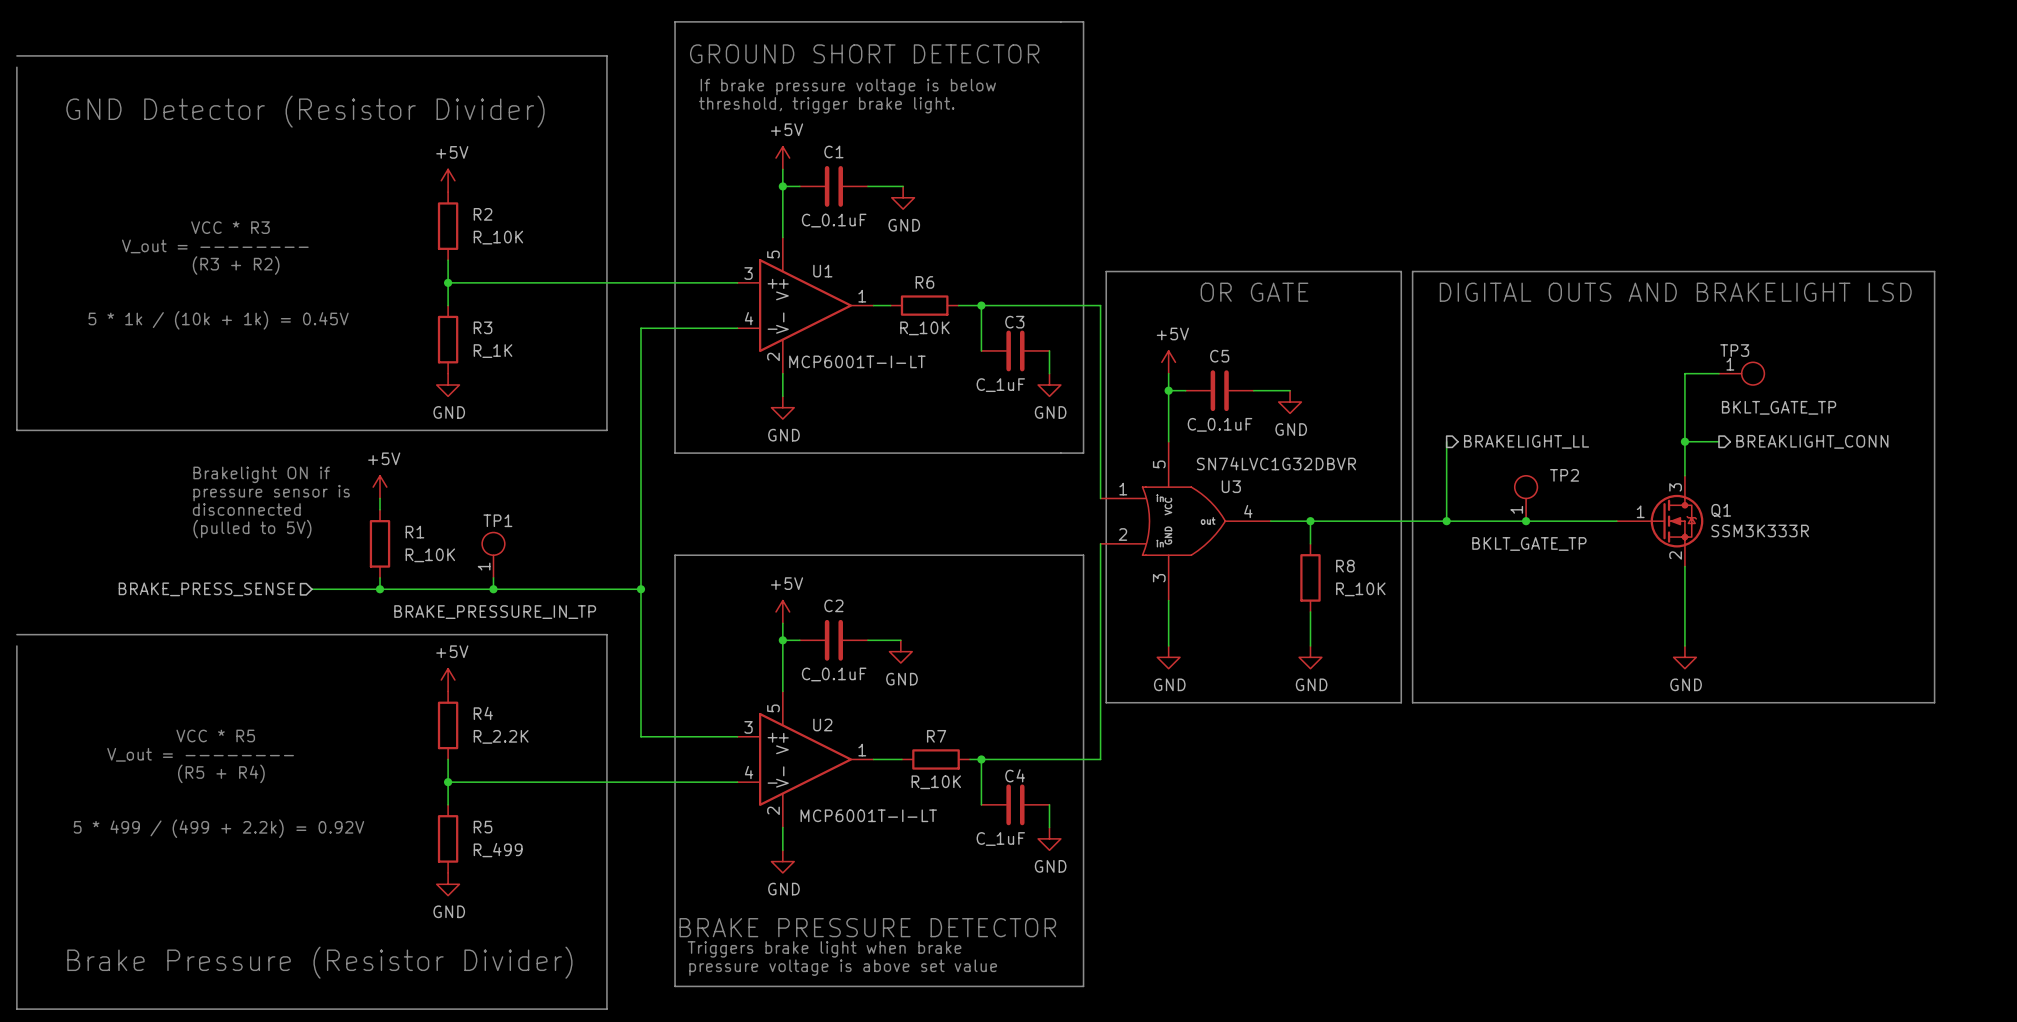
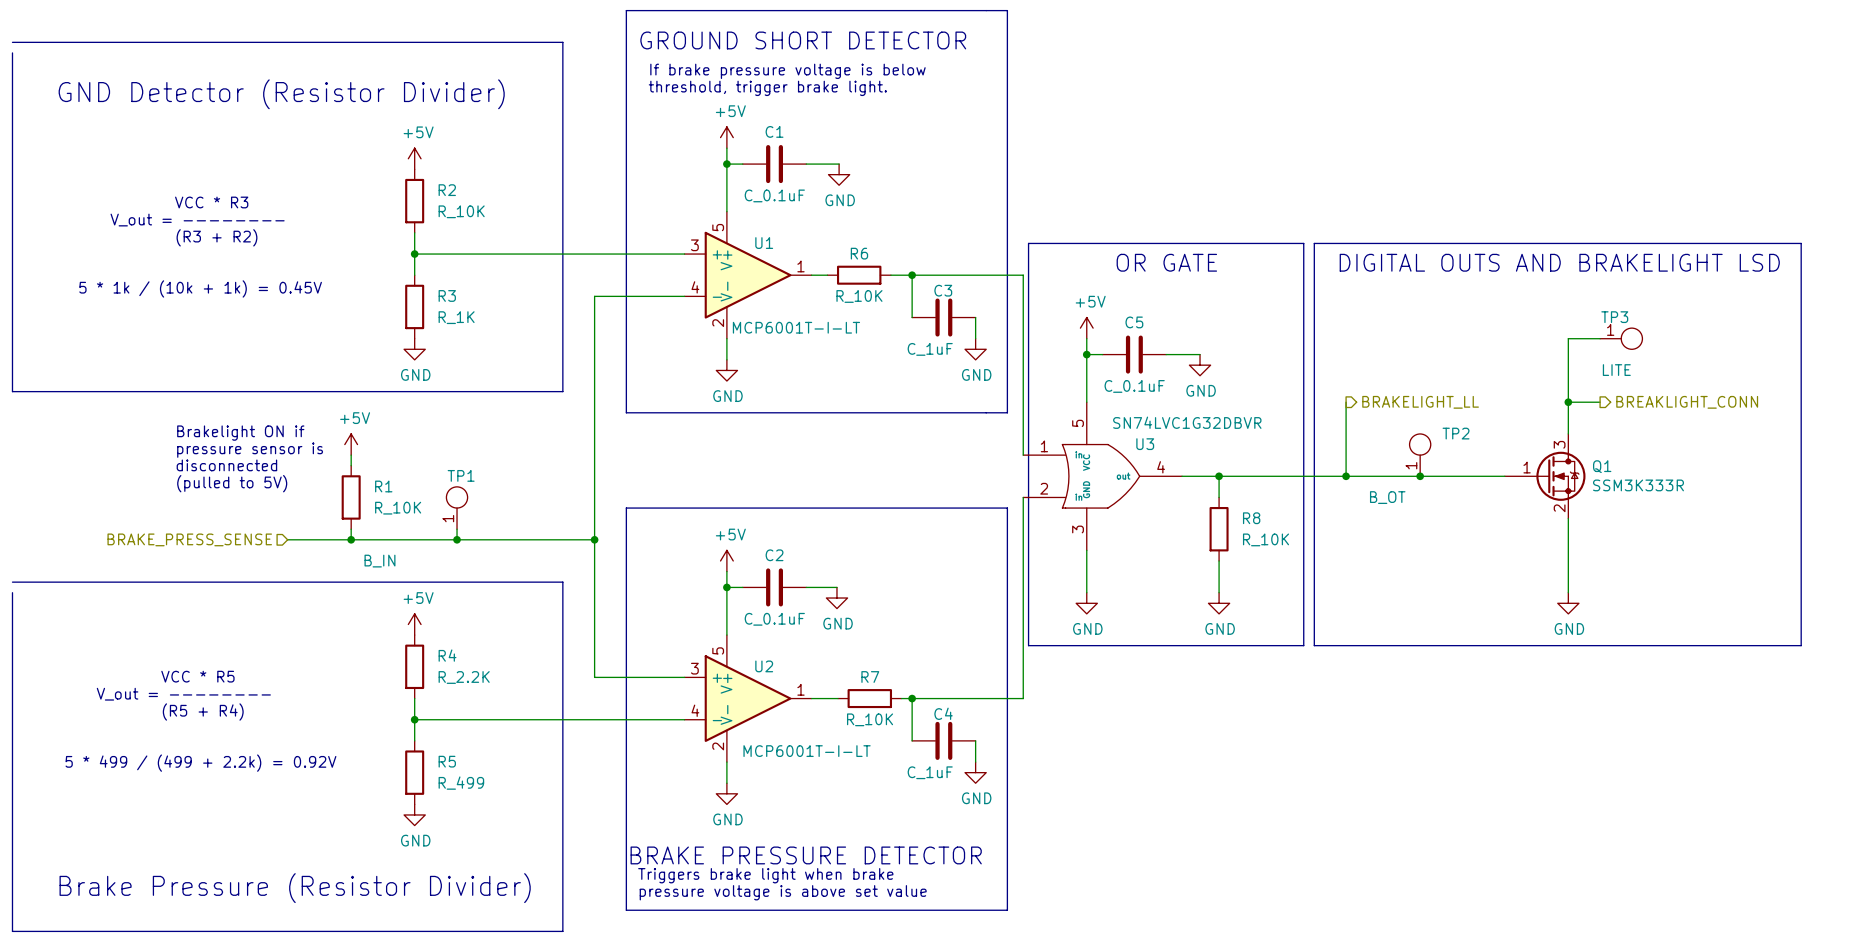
TP3 value: BKLT_GATE_TP (1779, 407) -> LITE (1616, 370)
TP2 value: BKLT_GATE_TP (1529, 543) -> B_OT (1387, 497)
TP1 value: BRAKE_PRESSURE_IN_TP (495, 612) -> B_IN (379, 561)

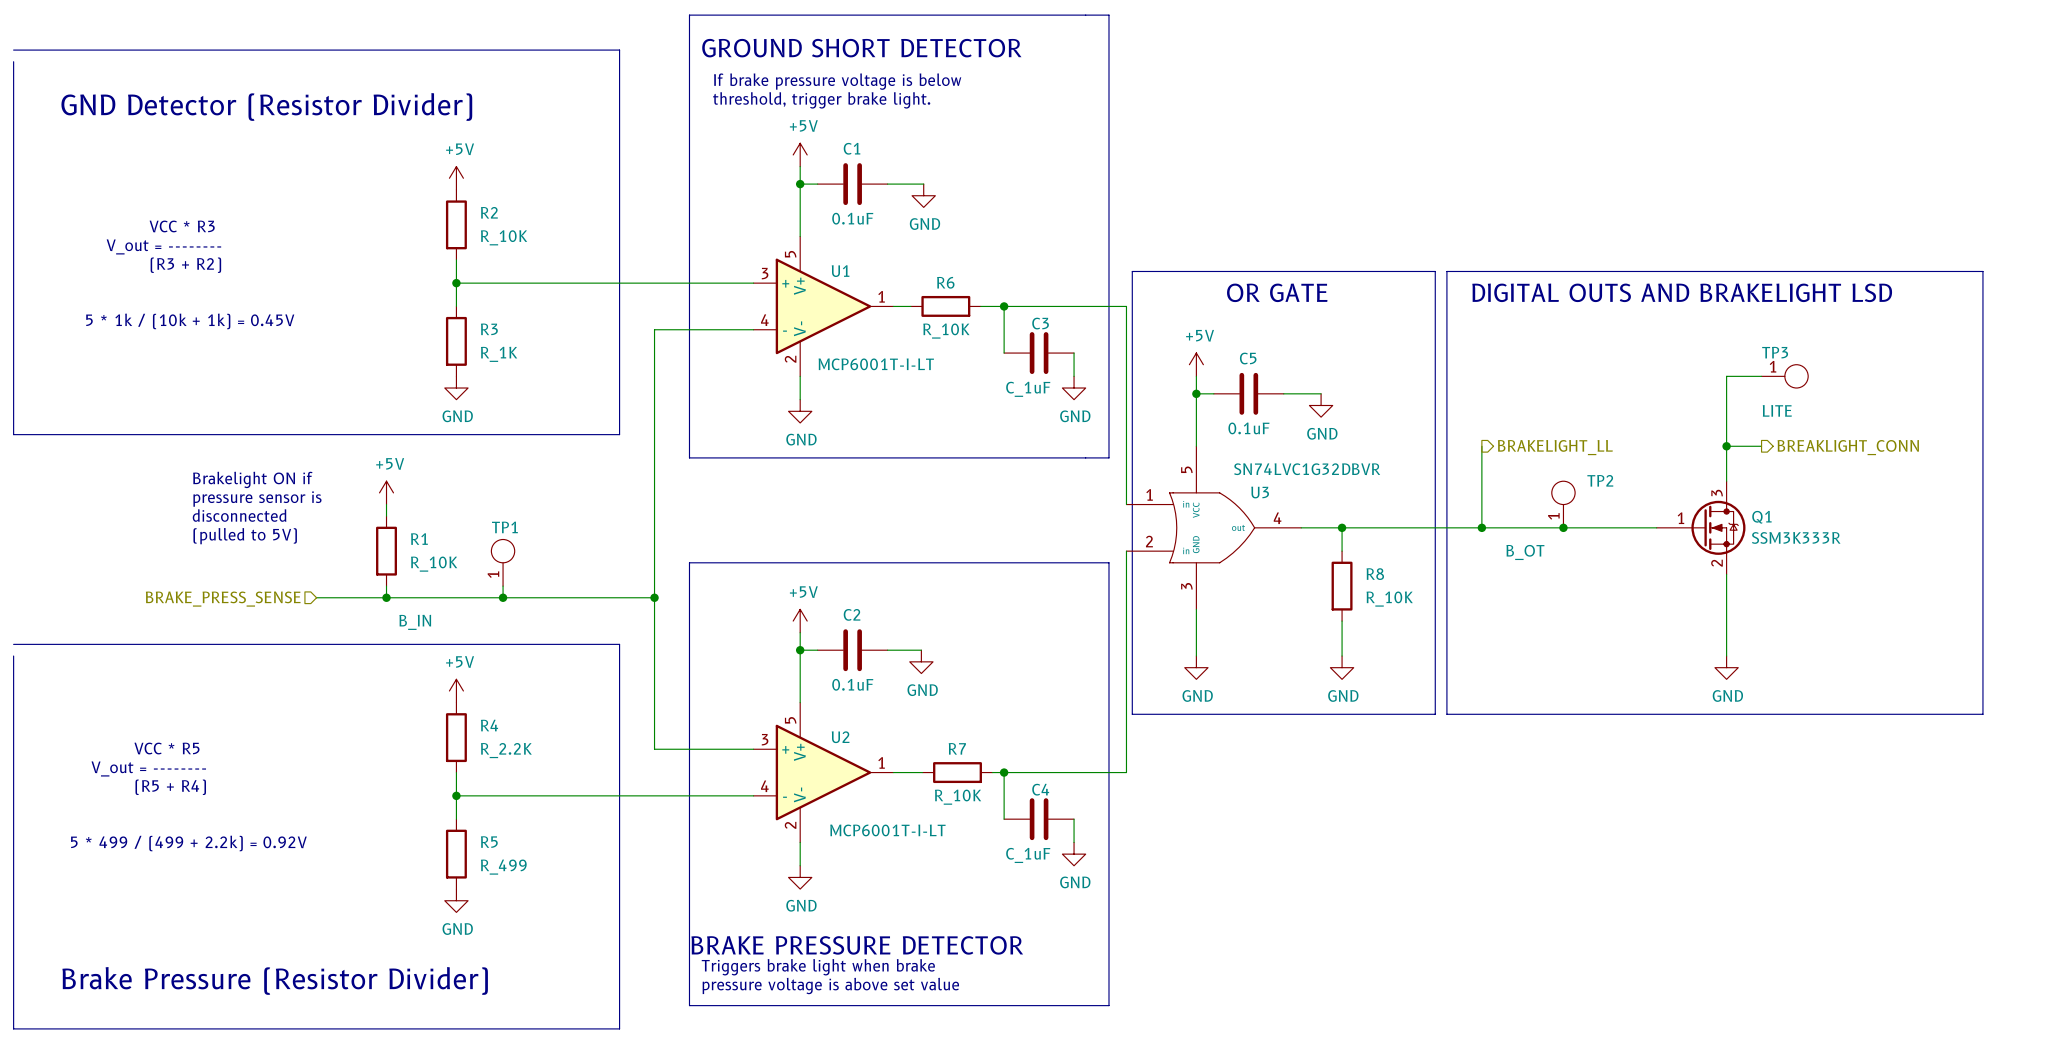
C1 value: C_0.1uF (774, 195) -> 0.1uF (852, 218)
C5 value: C_0.1uF (1134, 386) -> 0.1uF (1248, 428)
C2 value: C_0.1uF (774, 619) -> 0.1uF (852, 684)

